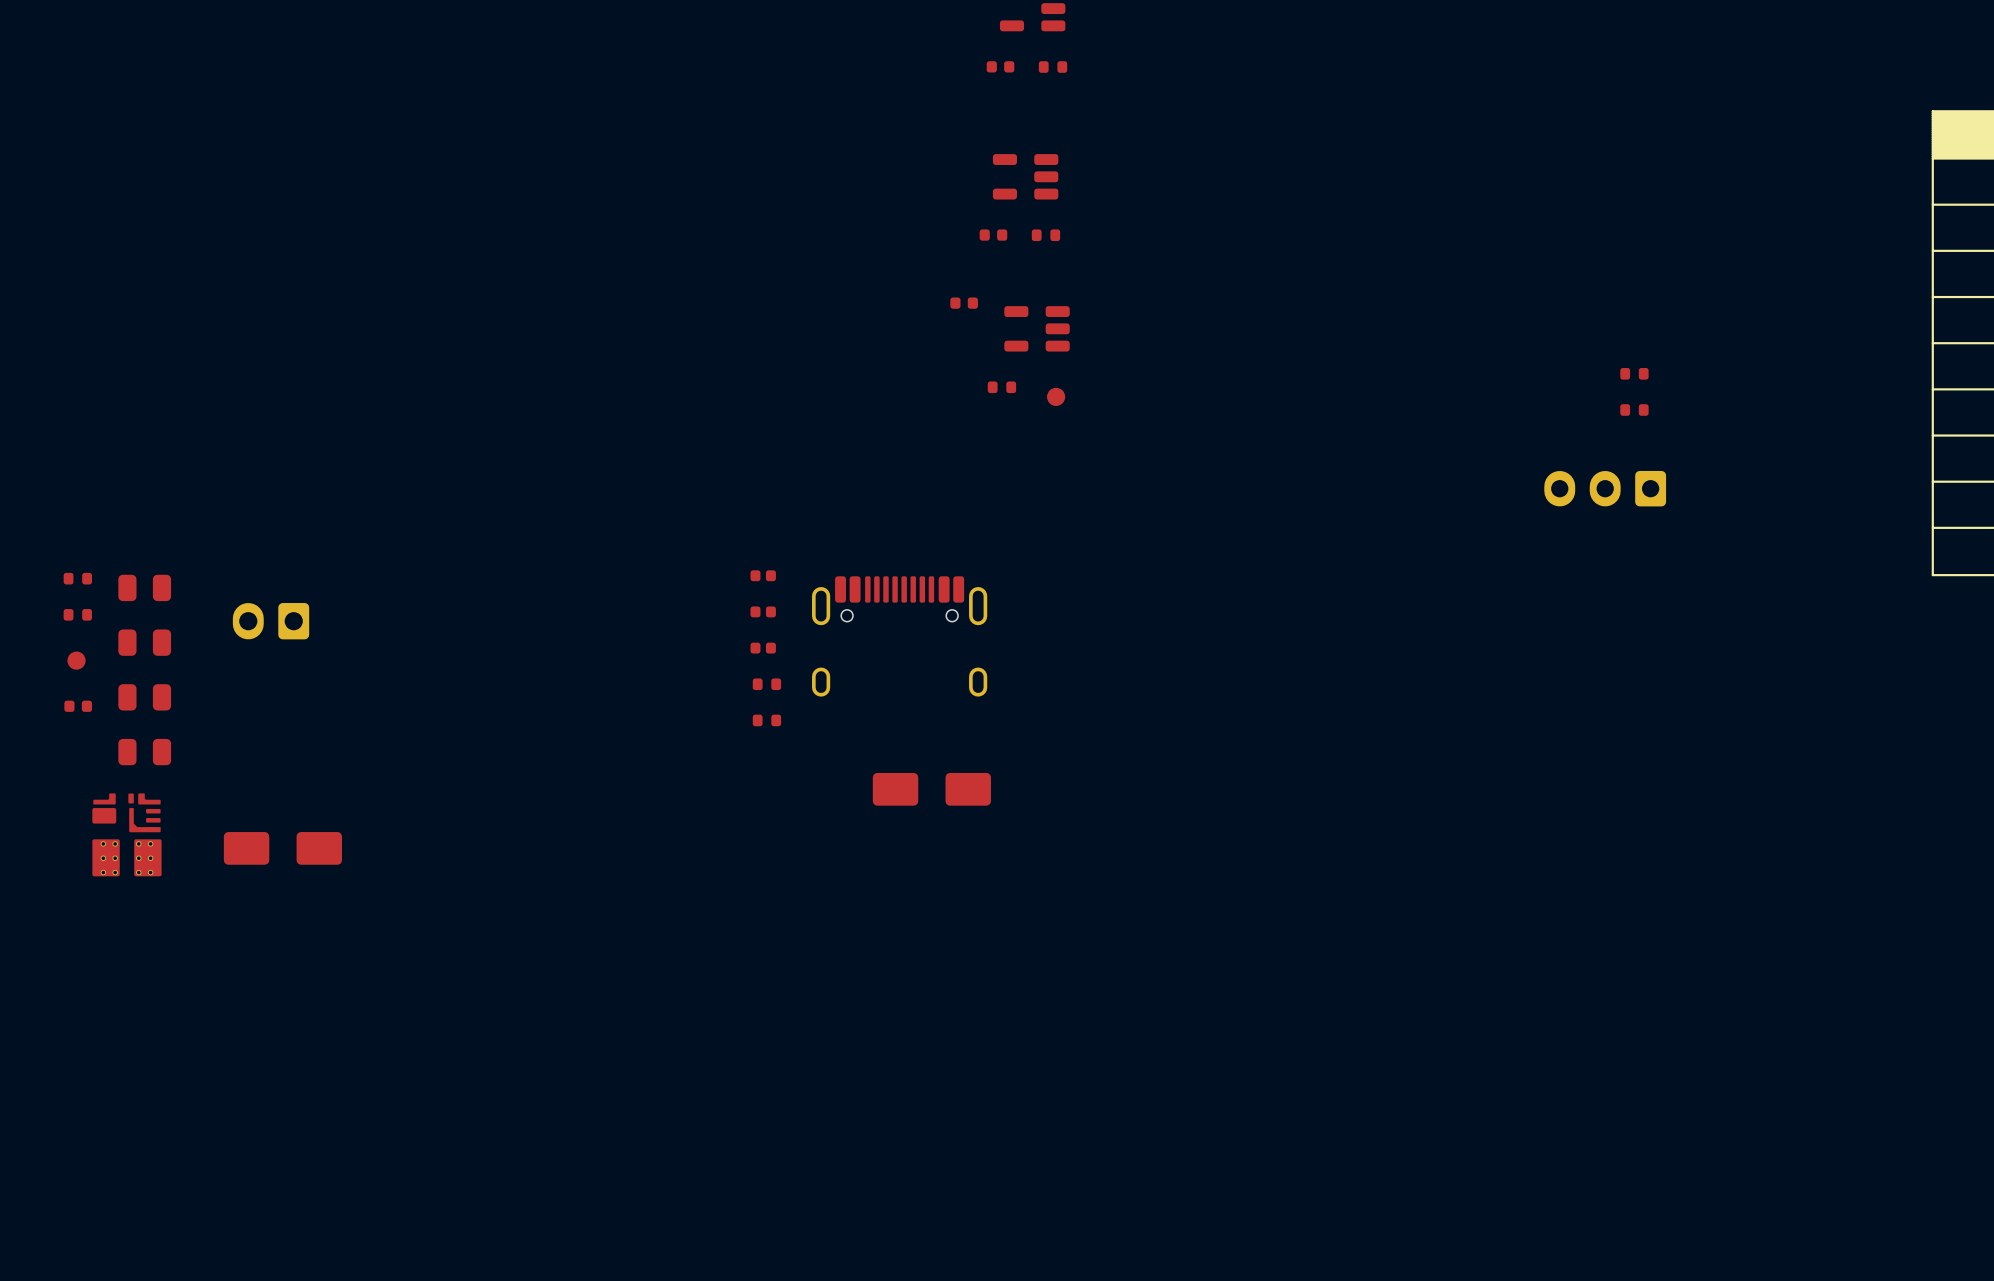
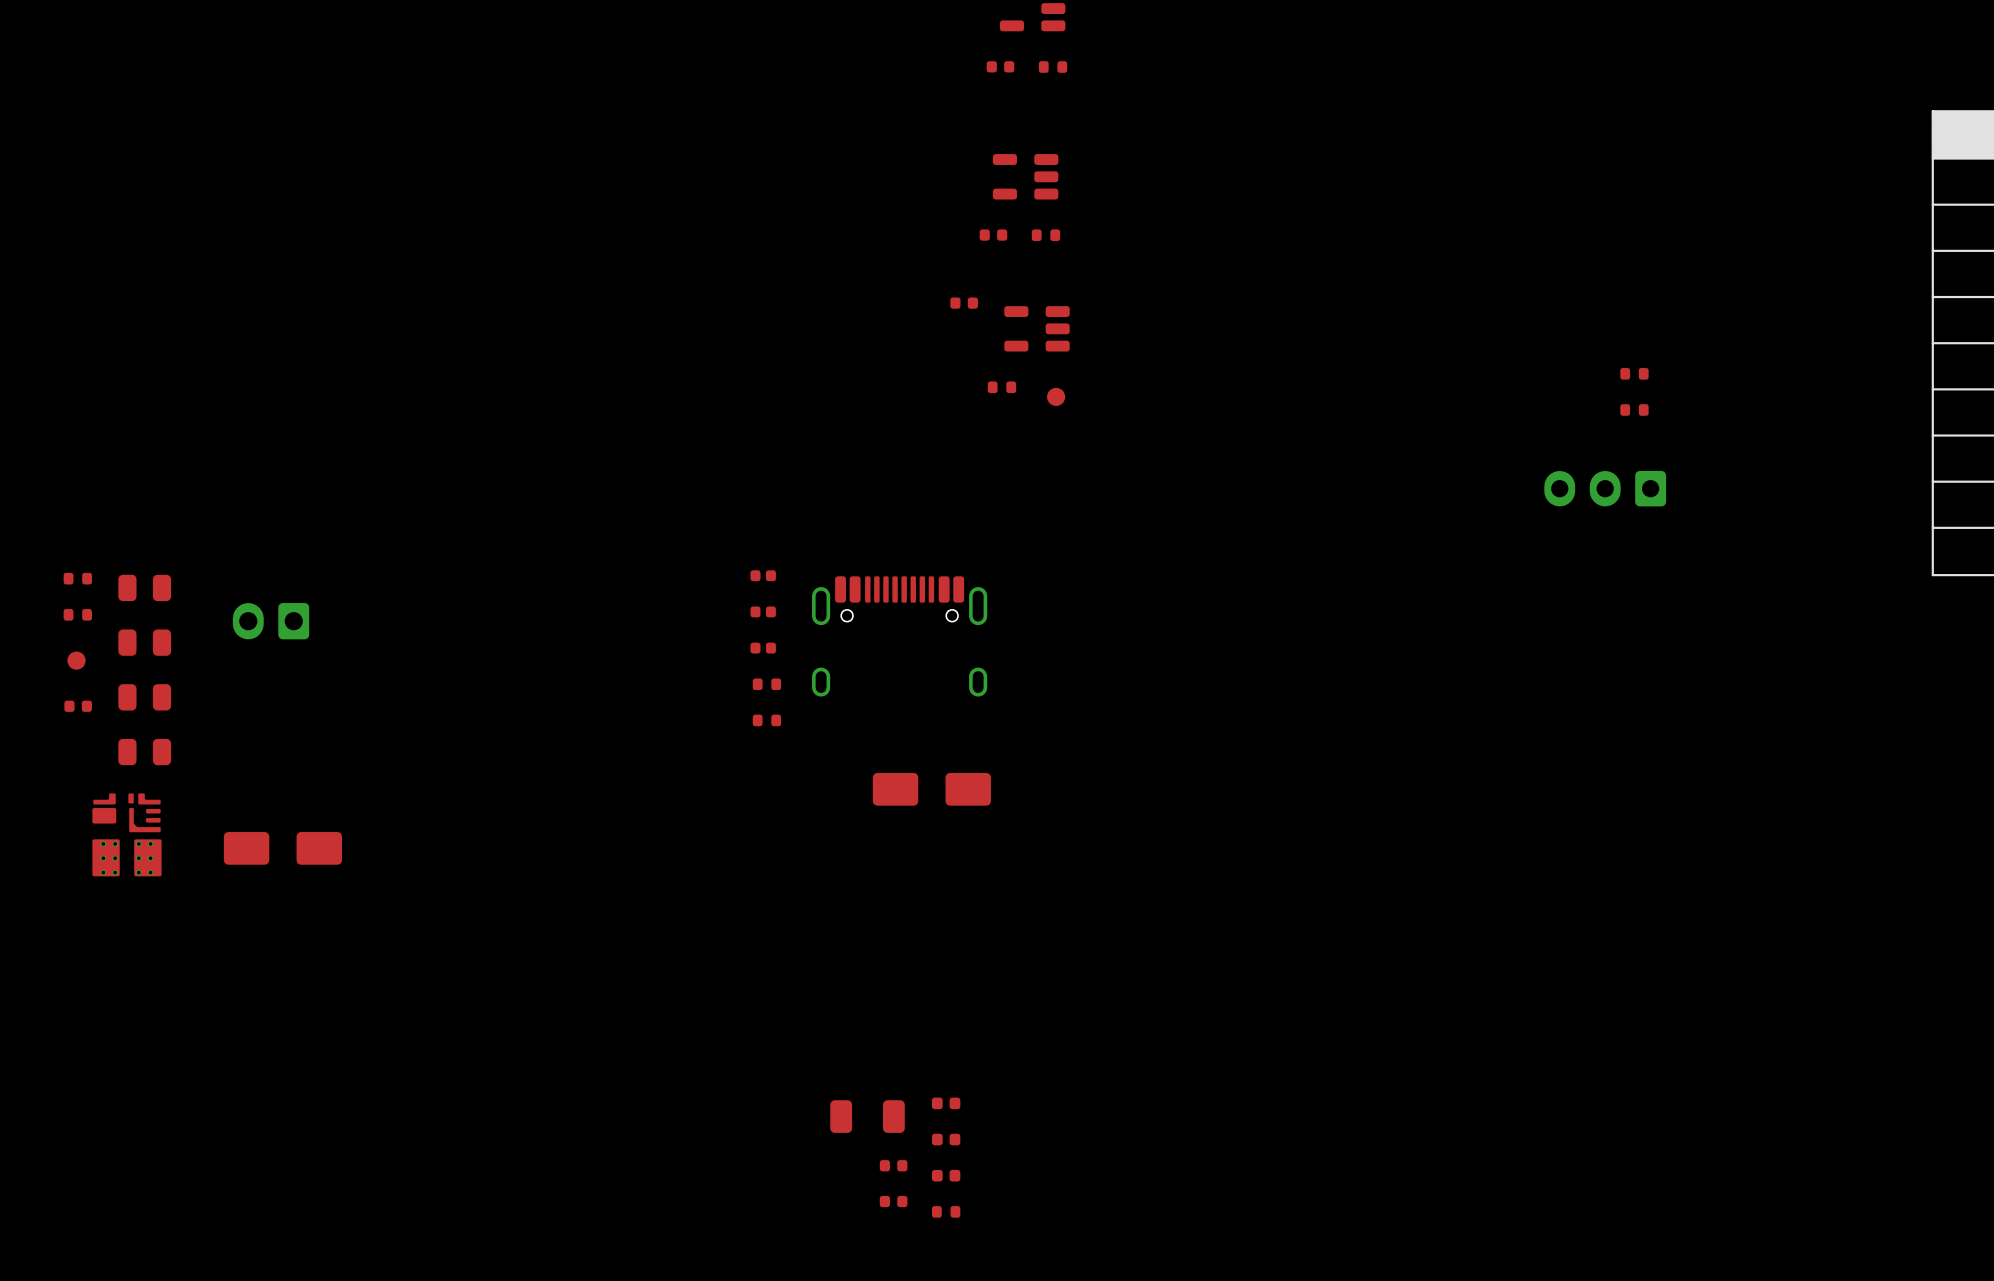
part: none -> (946, 1103)
part: none -> (867, 1116)
part: none -> (946, 1139)
part: none -> (893, 1165)
part: none -> (946, 1175)
part: none -> (893, 1201)
part: none -> (946, 1211)

